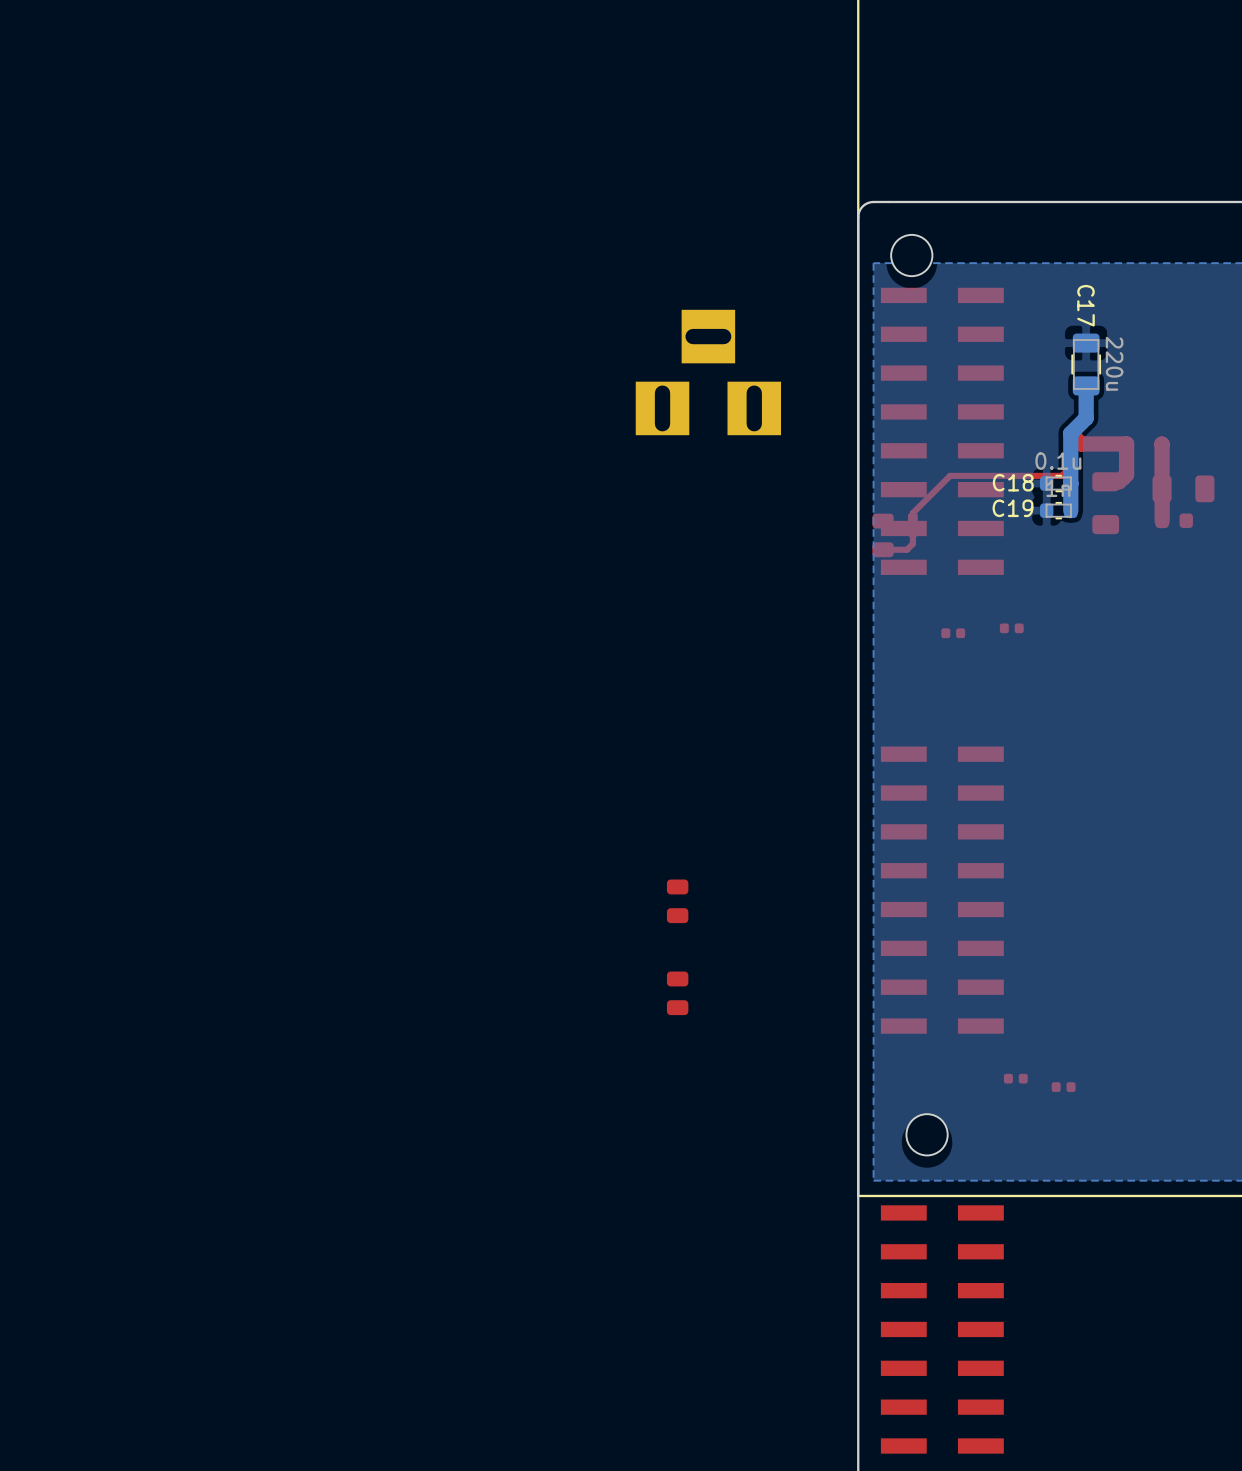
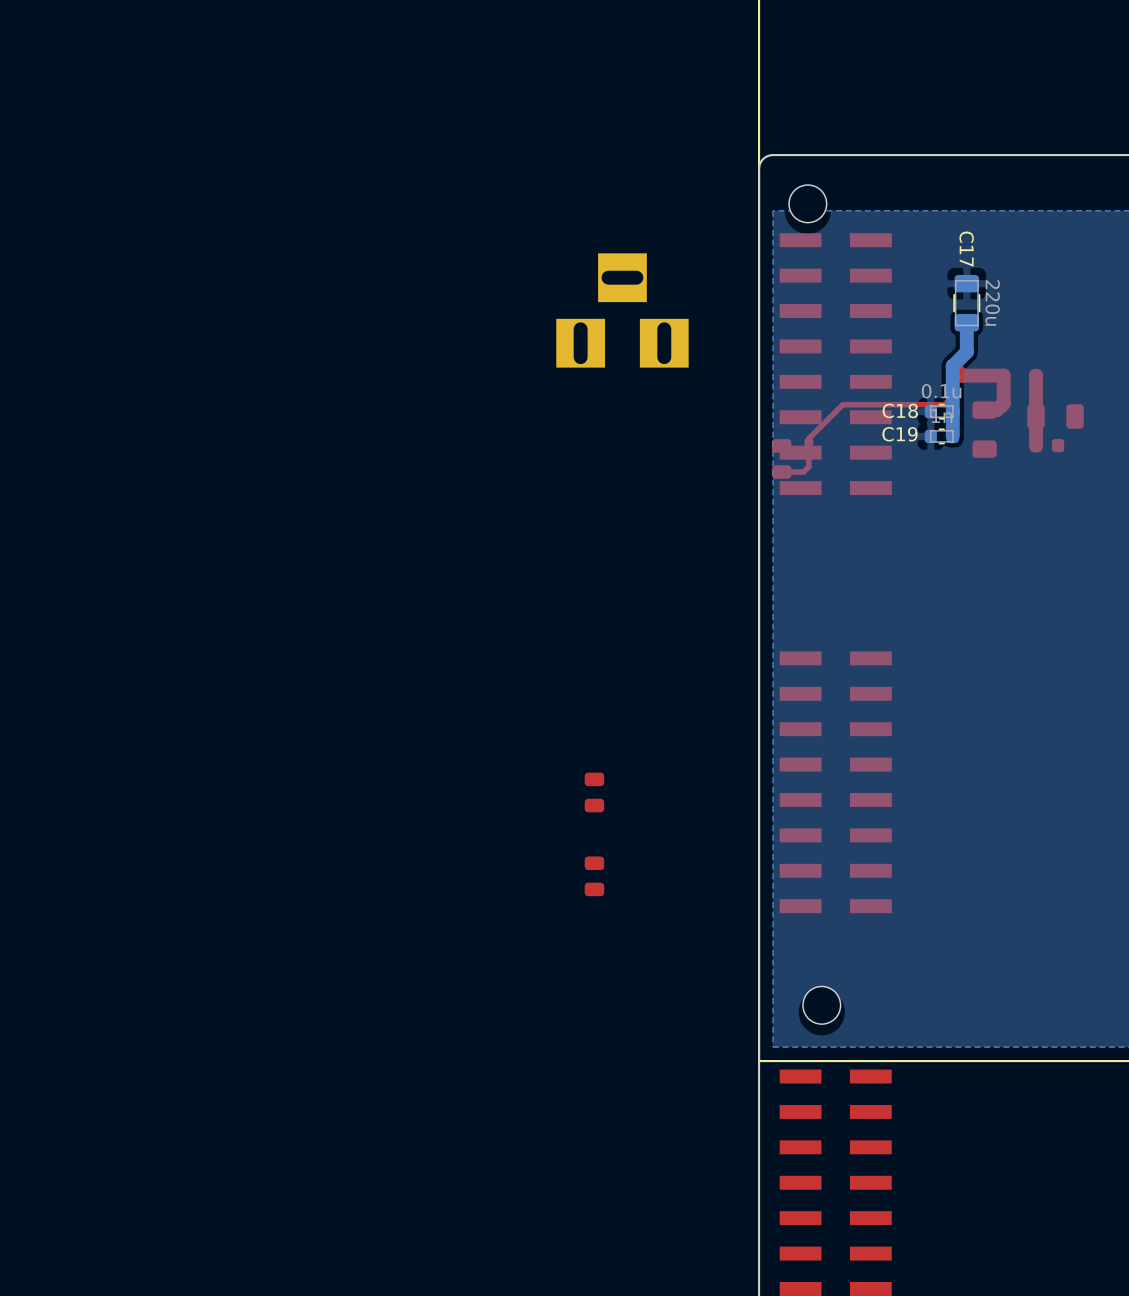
part: (1011, 628) -> none
part: (953, 633) -> none
part: (1015, 1078) -> none
part: (1063, 1087) -> none

